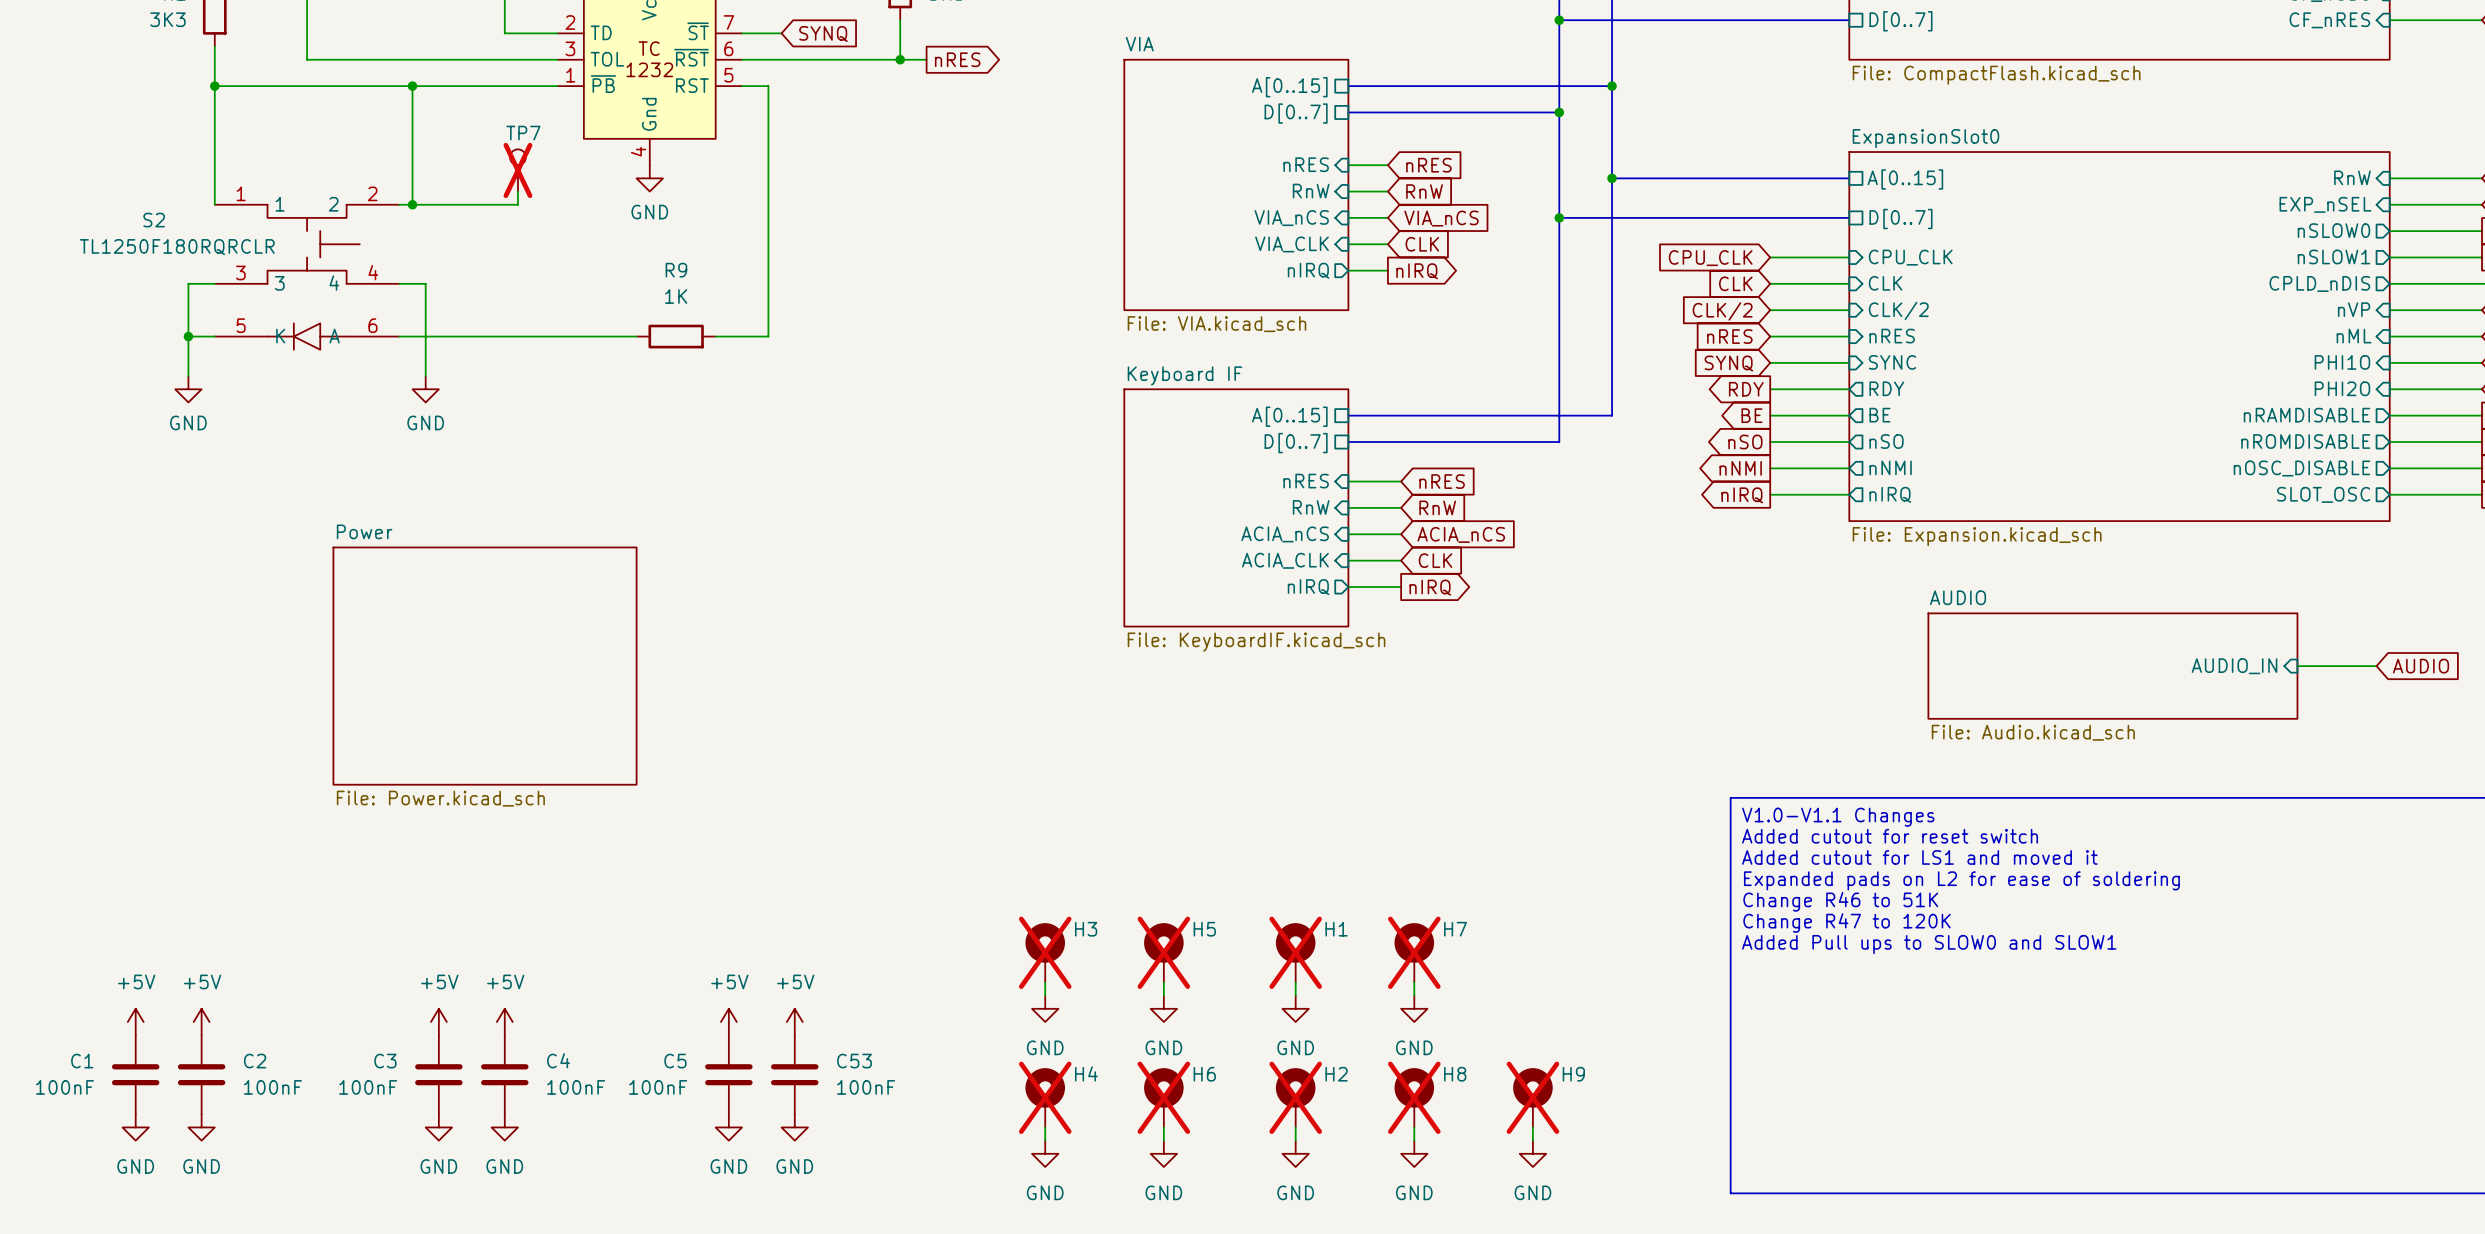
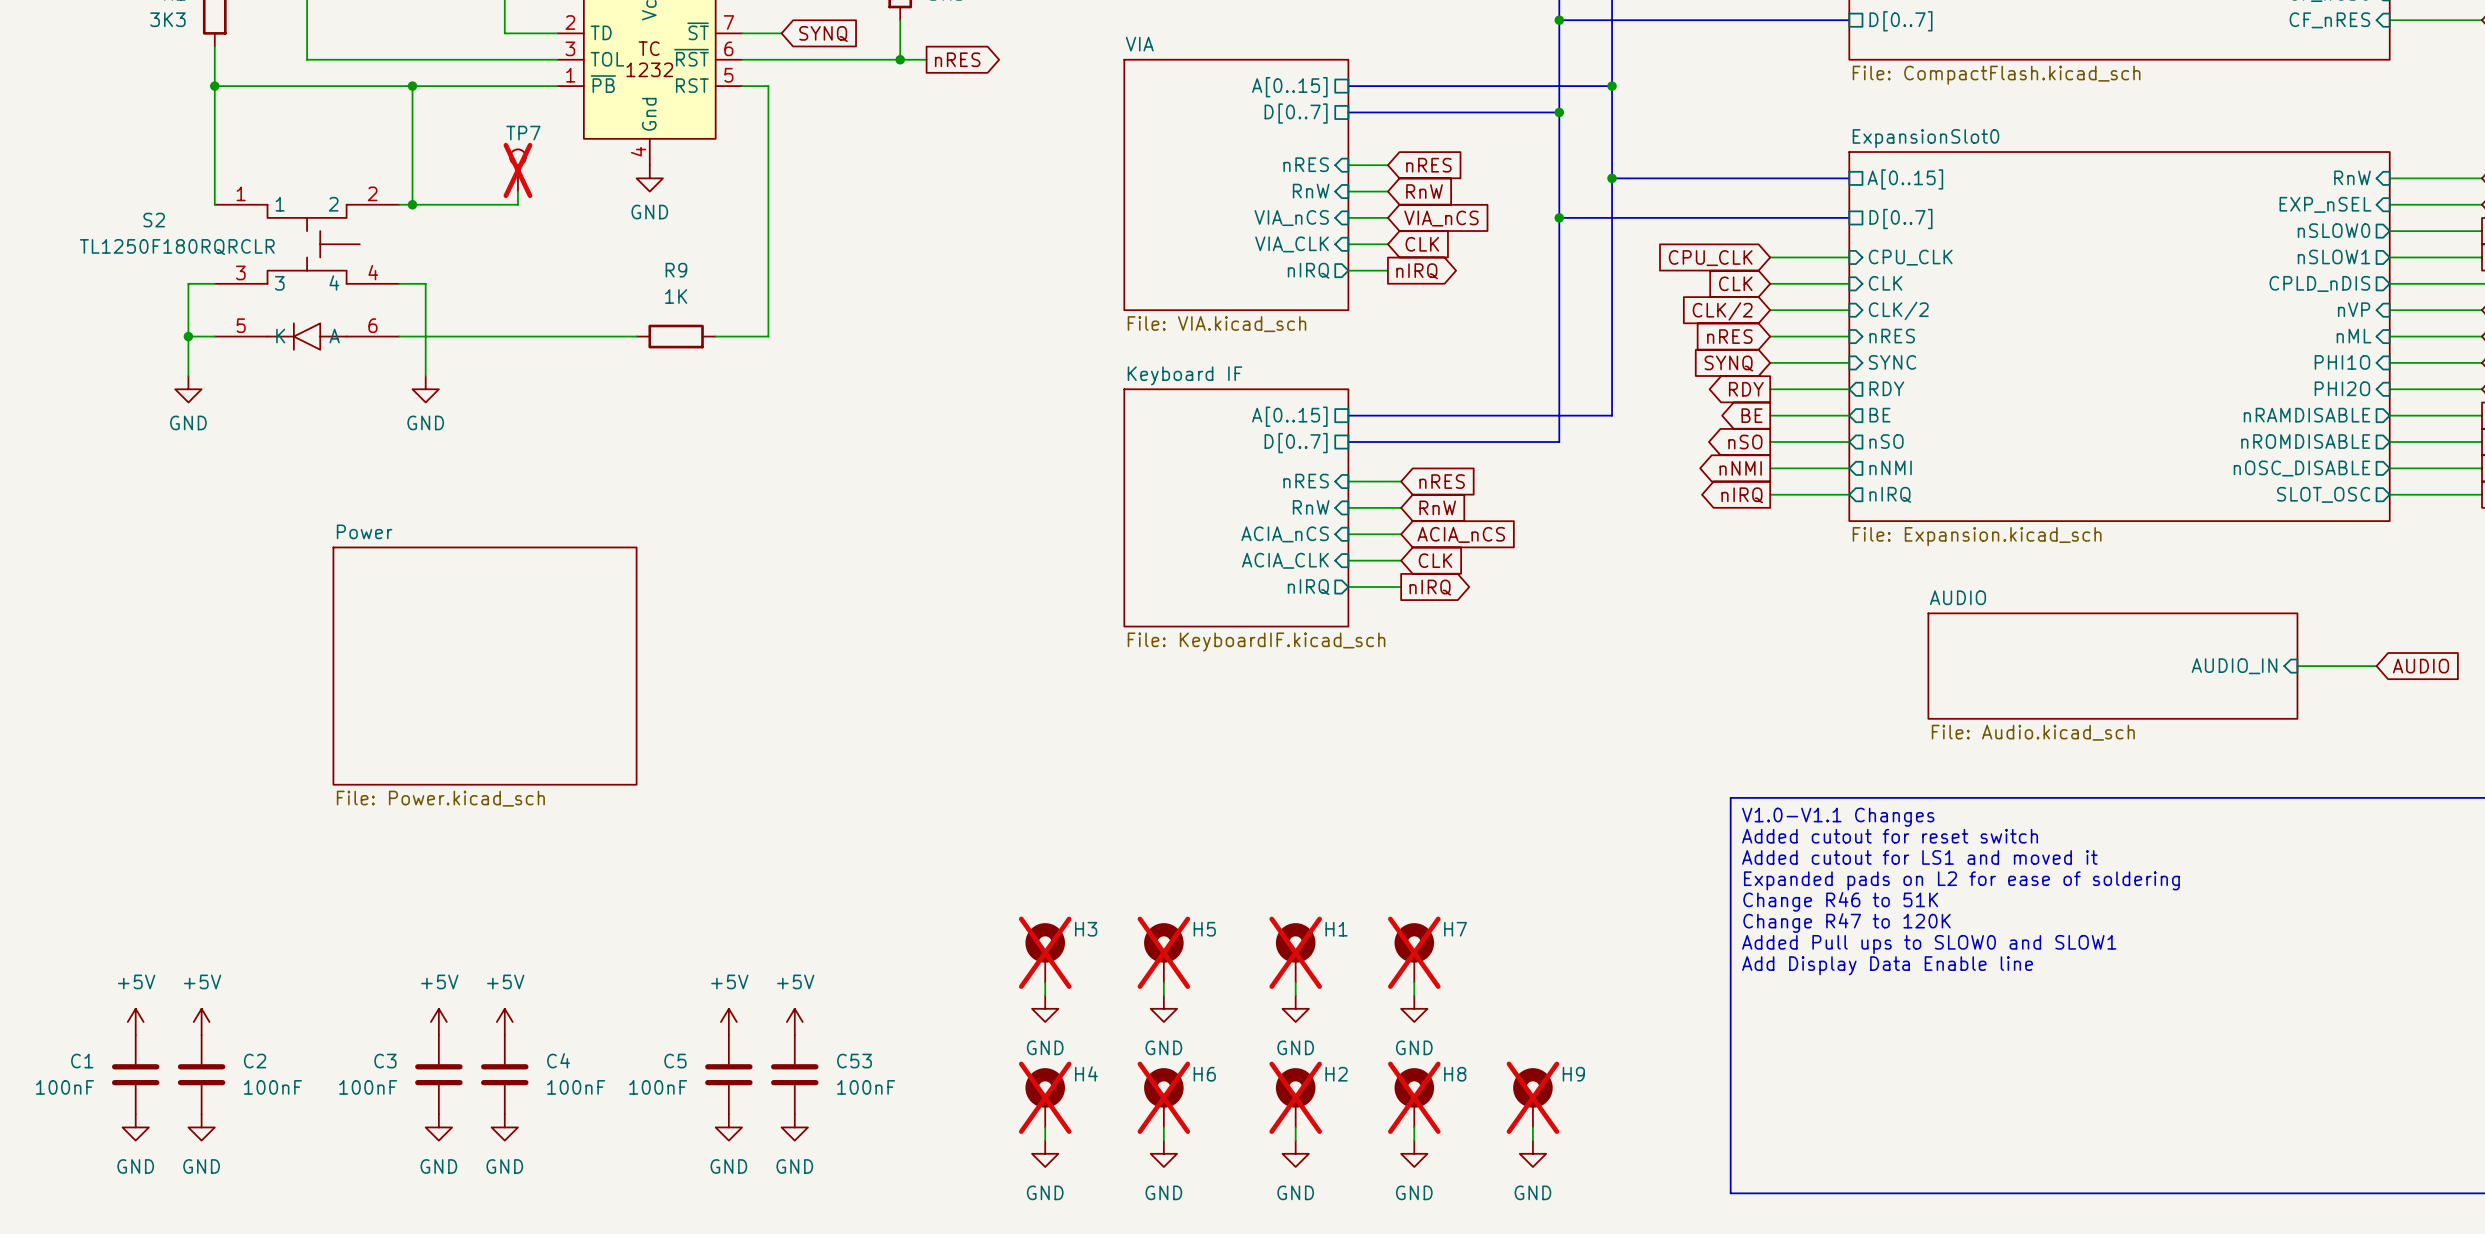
text: none -> Add Display Data Enable line (1887, 965)

